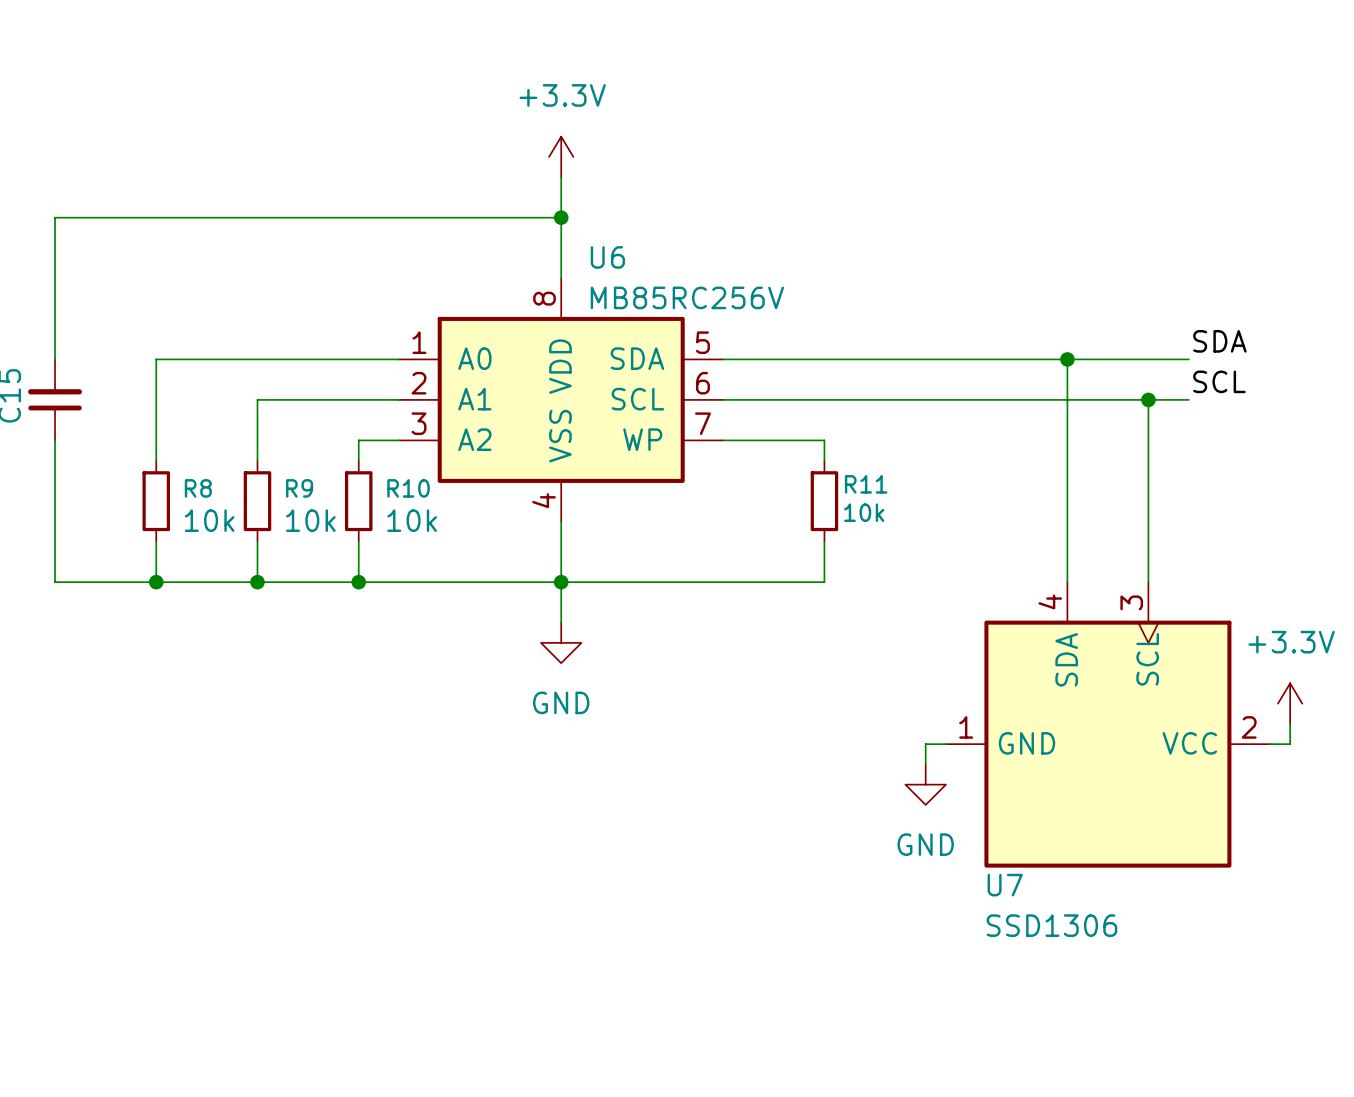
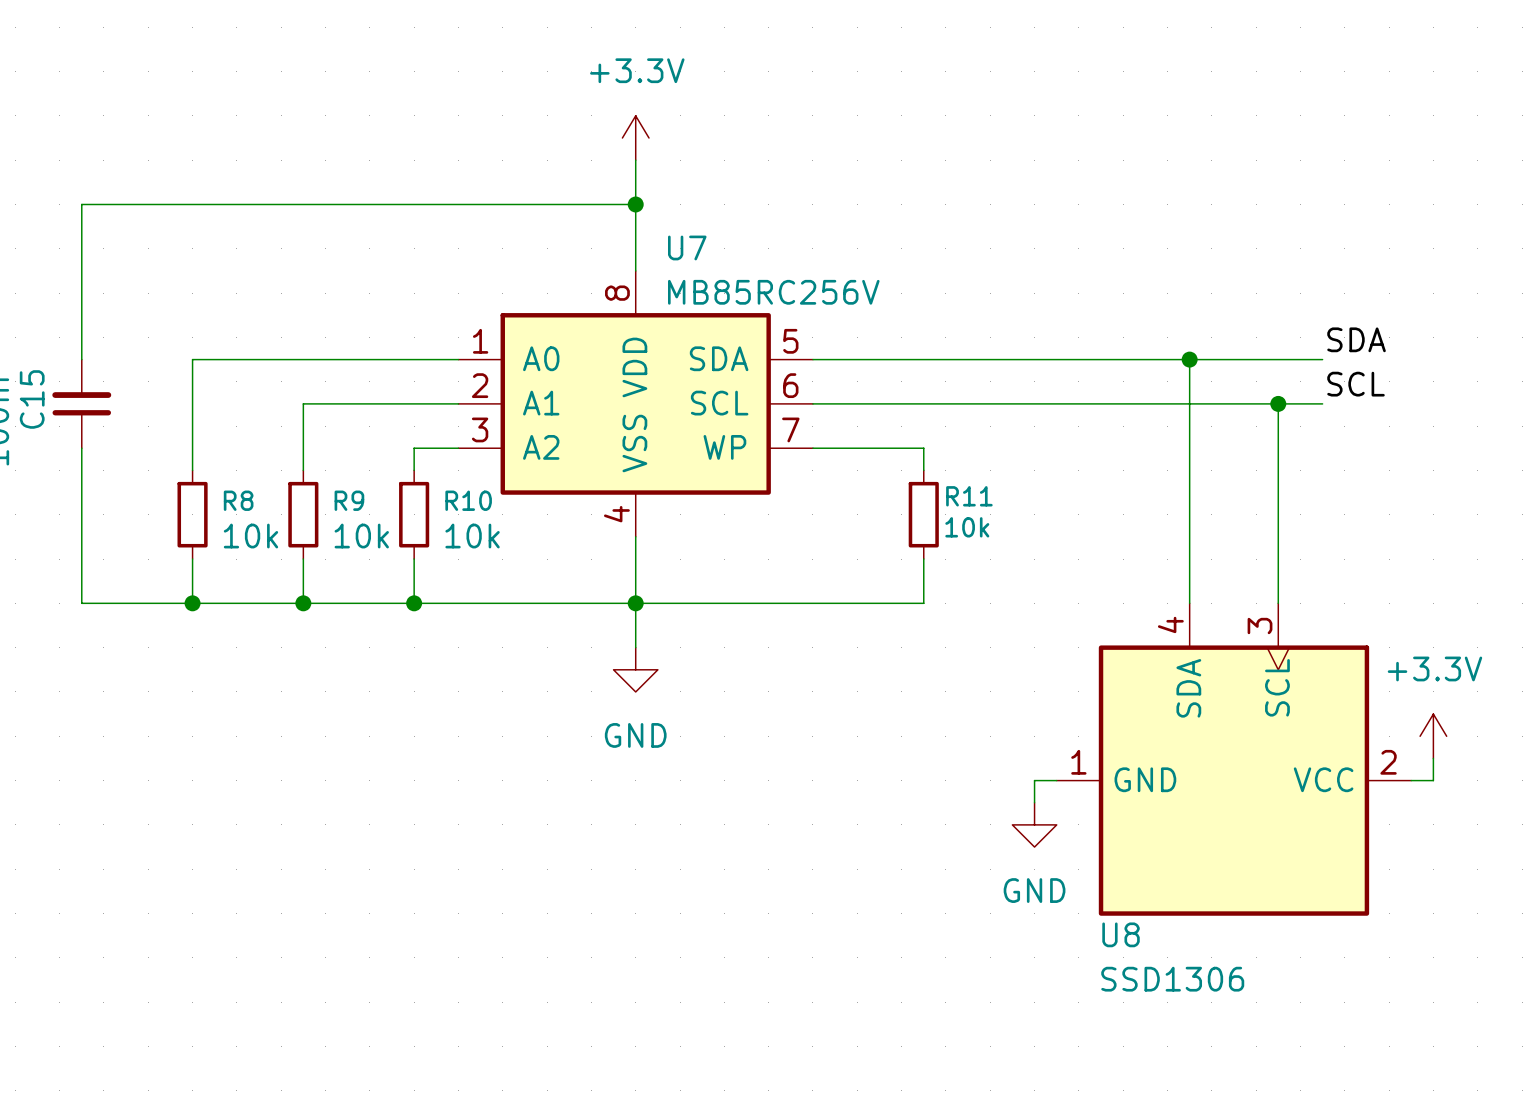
U6 name: U6 (607, 257) -> U7 (687, 247)
U7 name: U7 (1005, 885) -> U8 (1121, 934)

